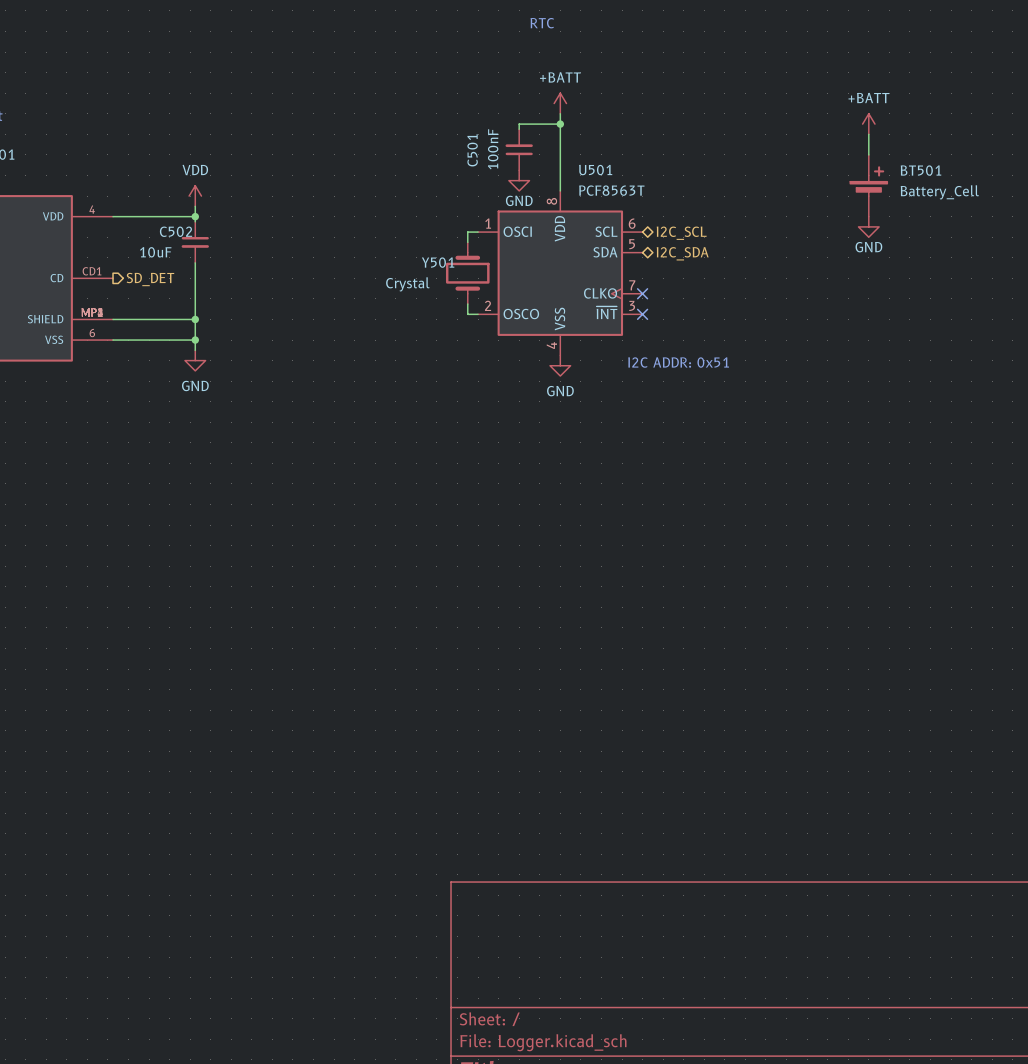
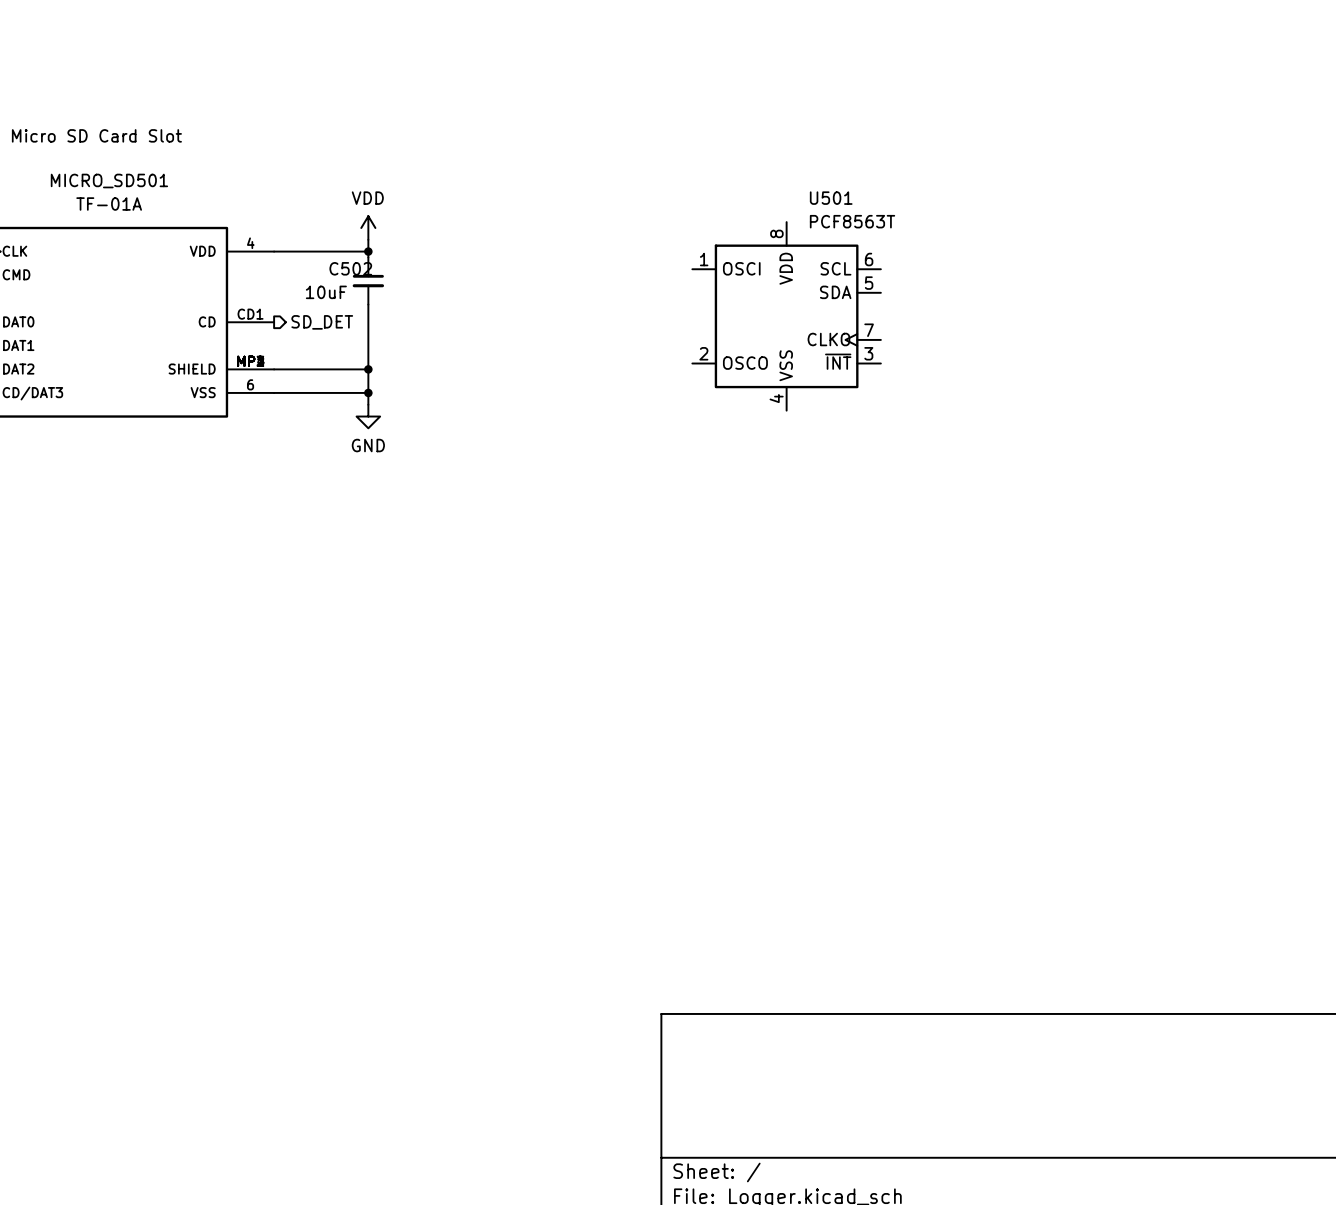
text: RTC (542, 23) -> none
power symbol: +BATT (560, 103) -> none
wire: (560, 113) (560, 190) -> none
wire: (560, 124) (519, 124) (519, 129) -> none
junction: (560, 124) -> none
power symbol: +BATT (868, 124) -> none
wire: (868, 134) (868, 154) -> none
C501: 100nF (519, 149) -> none
power symbol: GND (519, 180) -> none
BT501: Battery_Cell (868, 185) -> none
power symbol: GND (868, 226) -> none
wire: (478, 232) (467, 232) (467, 242) -> none
hierarchical label: I2C_SCL (681, 233) -> none
hierarchical label: I2C_SDA (682, 253) -> none
Y501: Crystal (467, 273) -> none
no-connect mark: (642, 293) -> none
wire: (467, 304) (467, 314) (478, 314) -> none
no-connect mark: (642, 314) -> none
text: I2C ADDR: 0x51 (678, 362) -> none
power symbol: GND (560, 365) -> none

